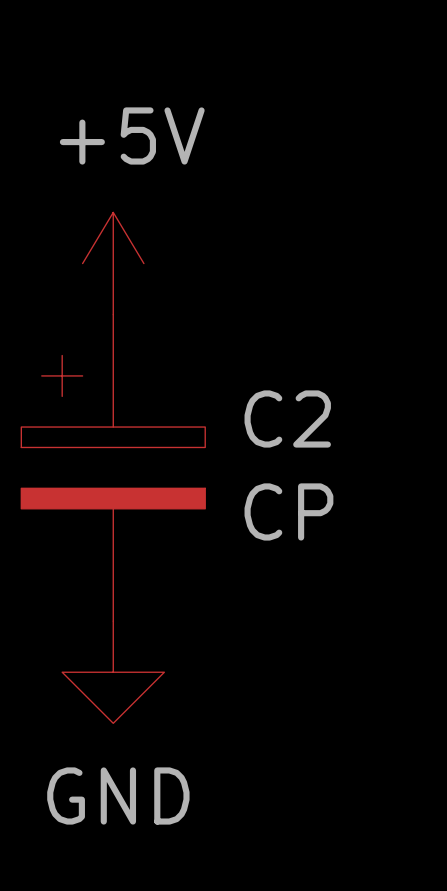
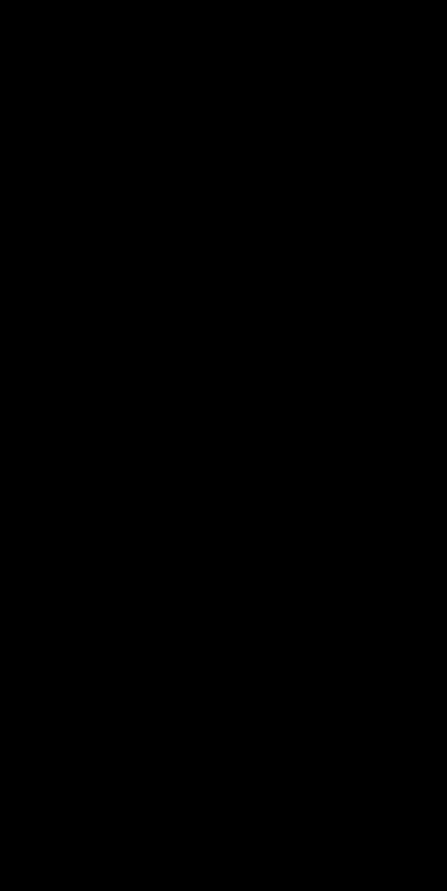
power symbol: +5V (113, 263) -> none
C2: CP (113, 467) -> none
power symbol: GND (113, 672) -> none

